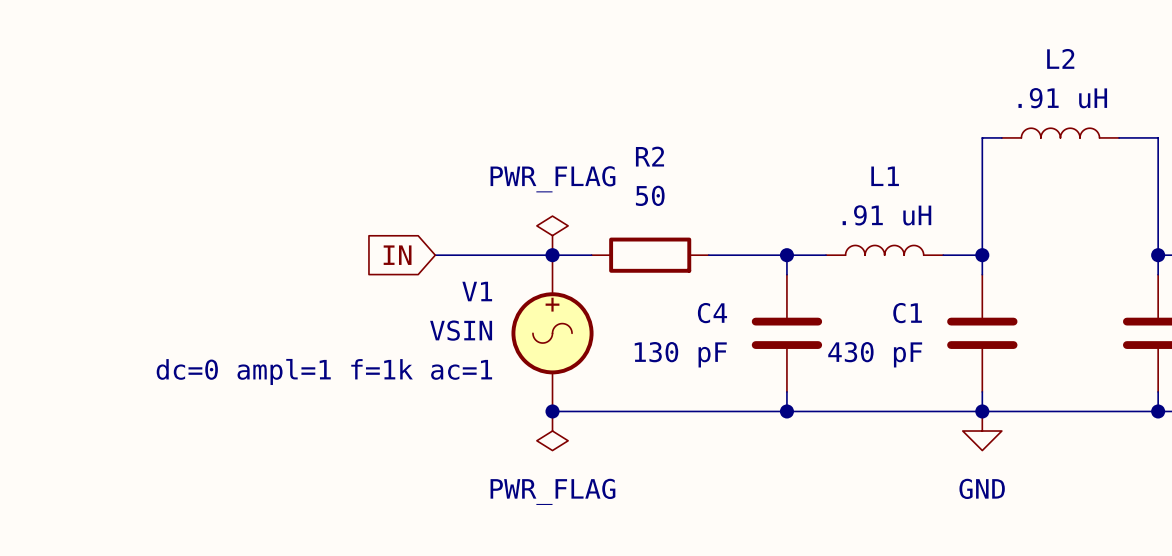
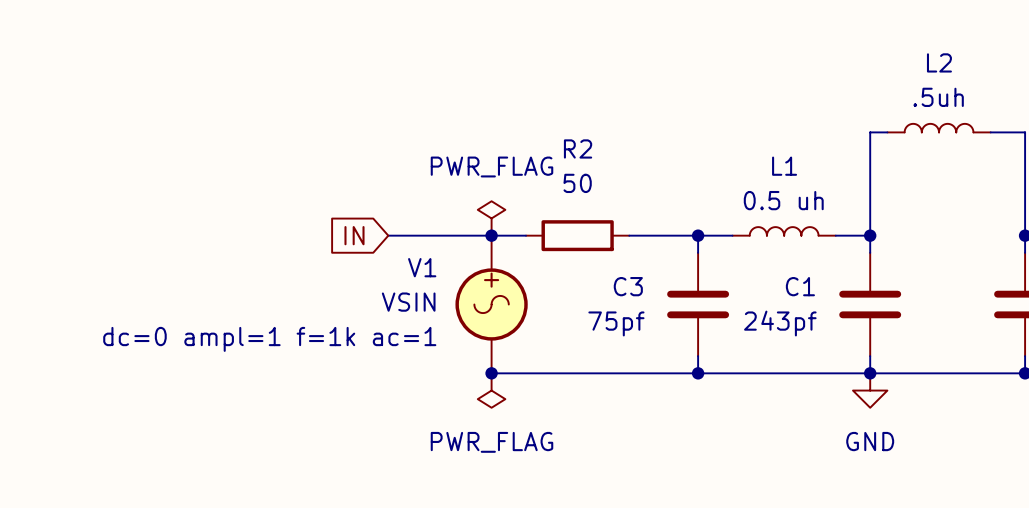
L2 value: .91 uH (1062, 98) -> .5uh (938, 97)
L1 value: .91 uH (886, 215) -> 0.5 uh (783, 200)
C4 name: C4 (712, 313) -> C3 (628, 286)
C4 value: 130 pF (680, 354) -> 75pf (616, 323)
C1 value: 430 pF (875, 354) -> 243pf (780, 323)

